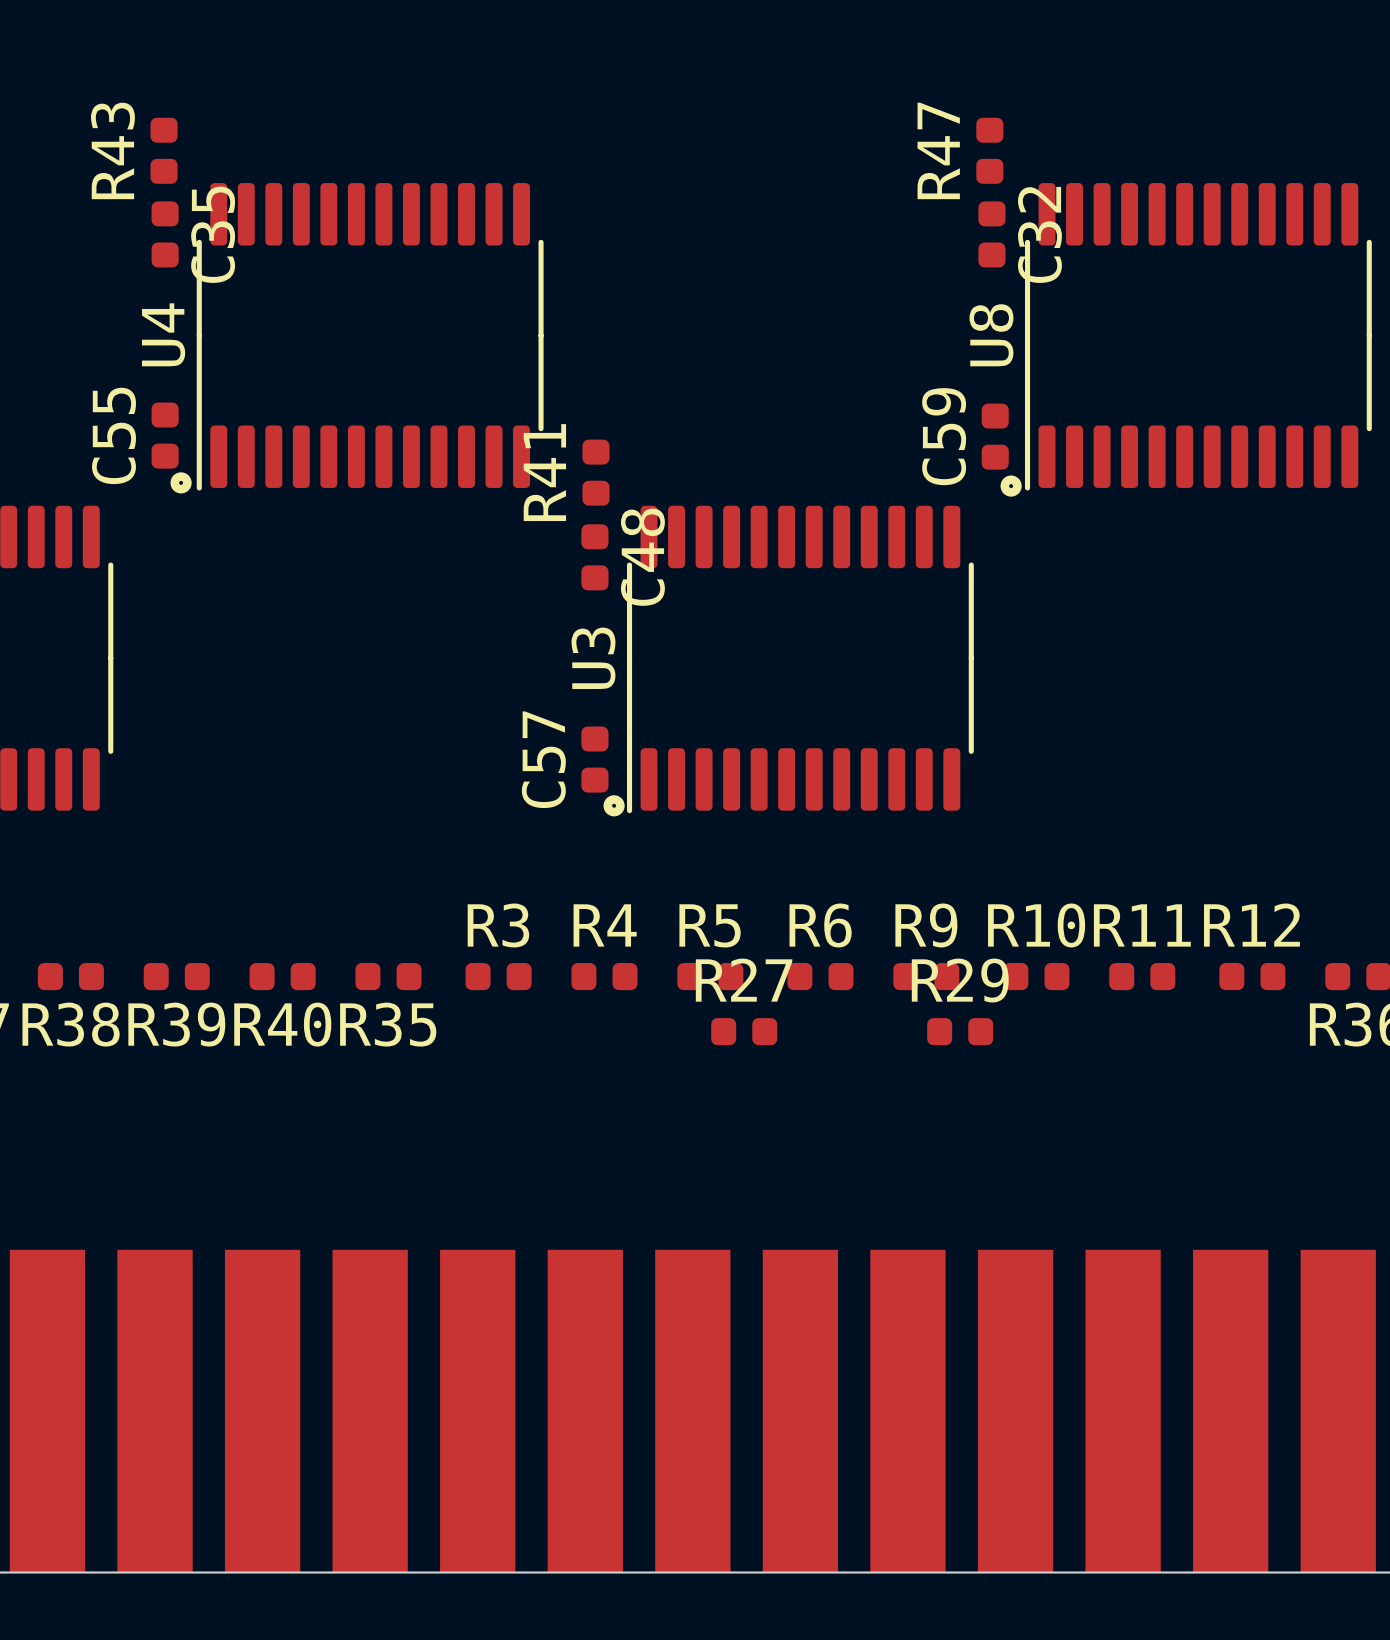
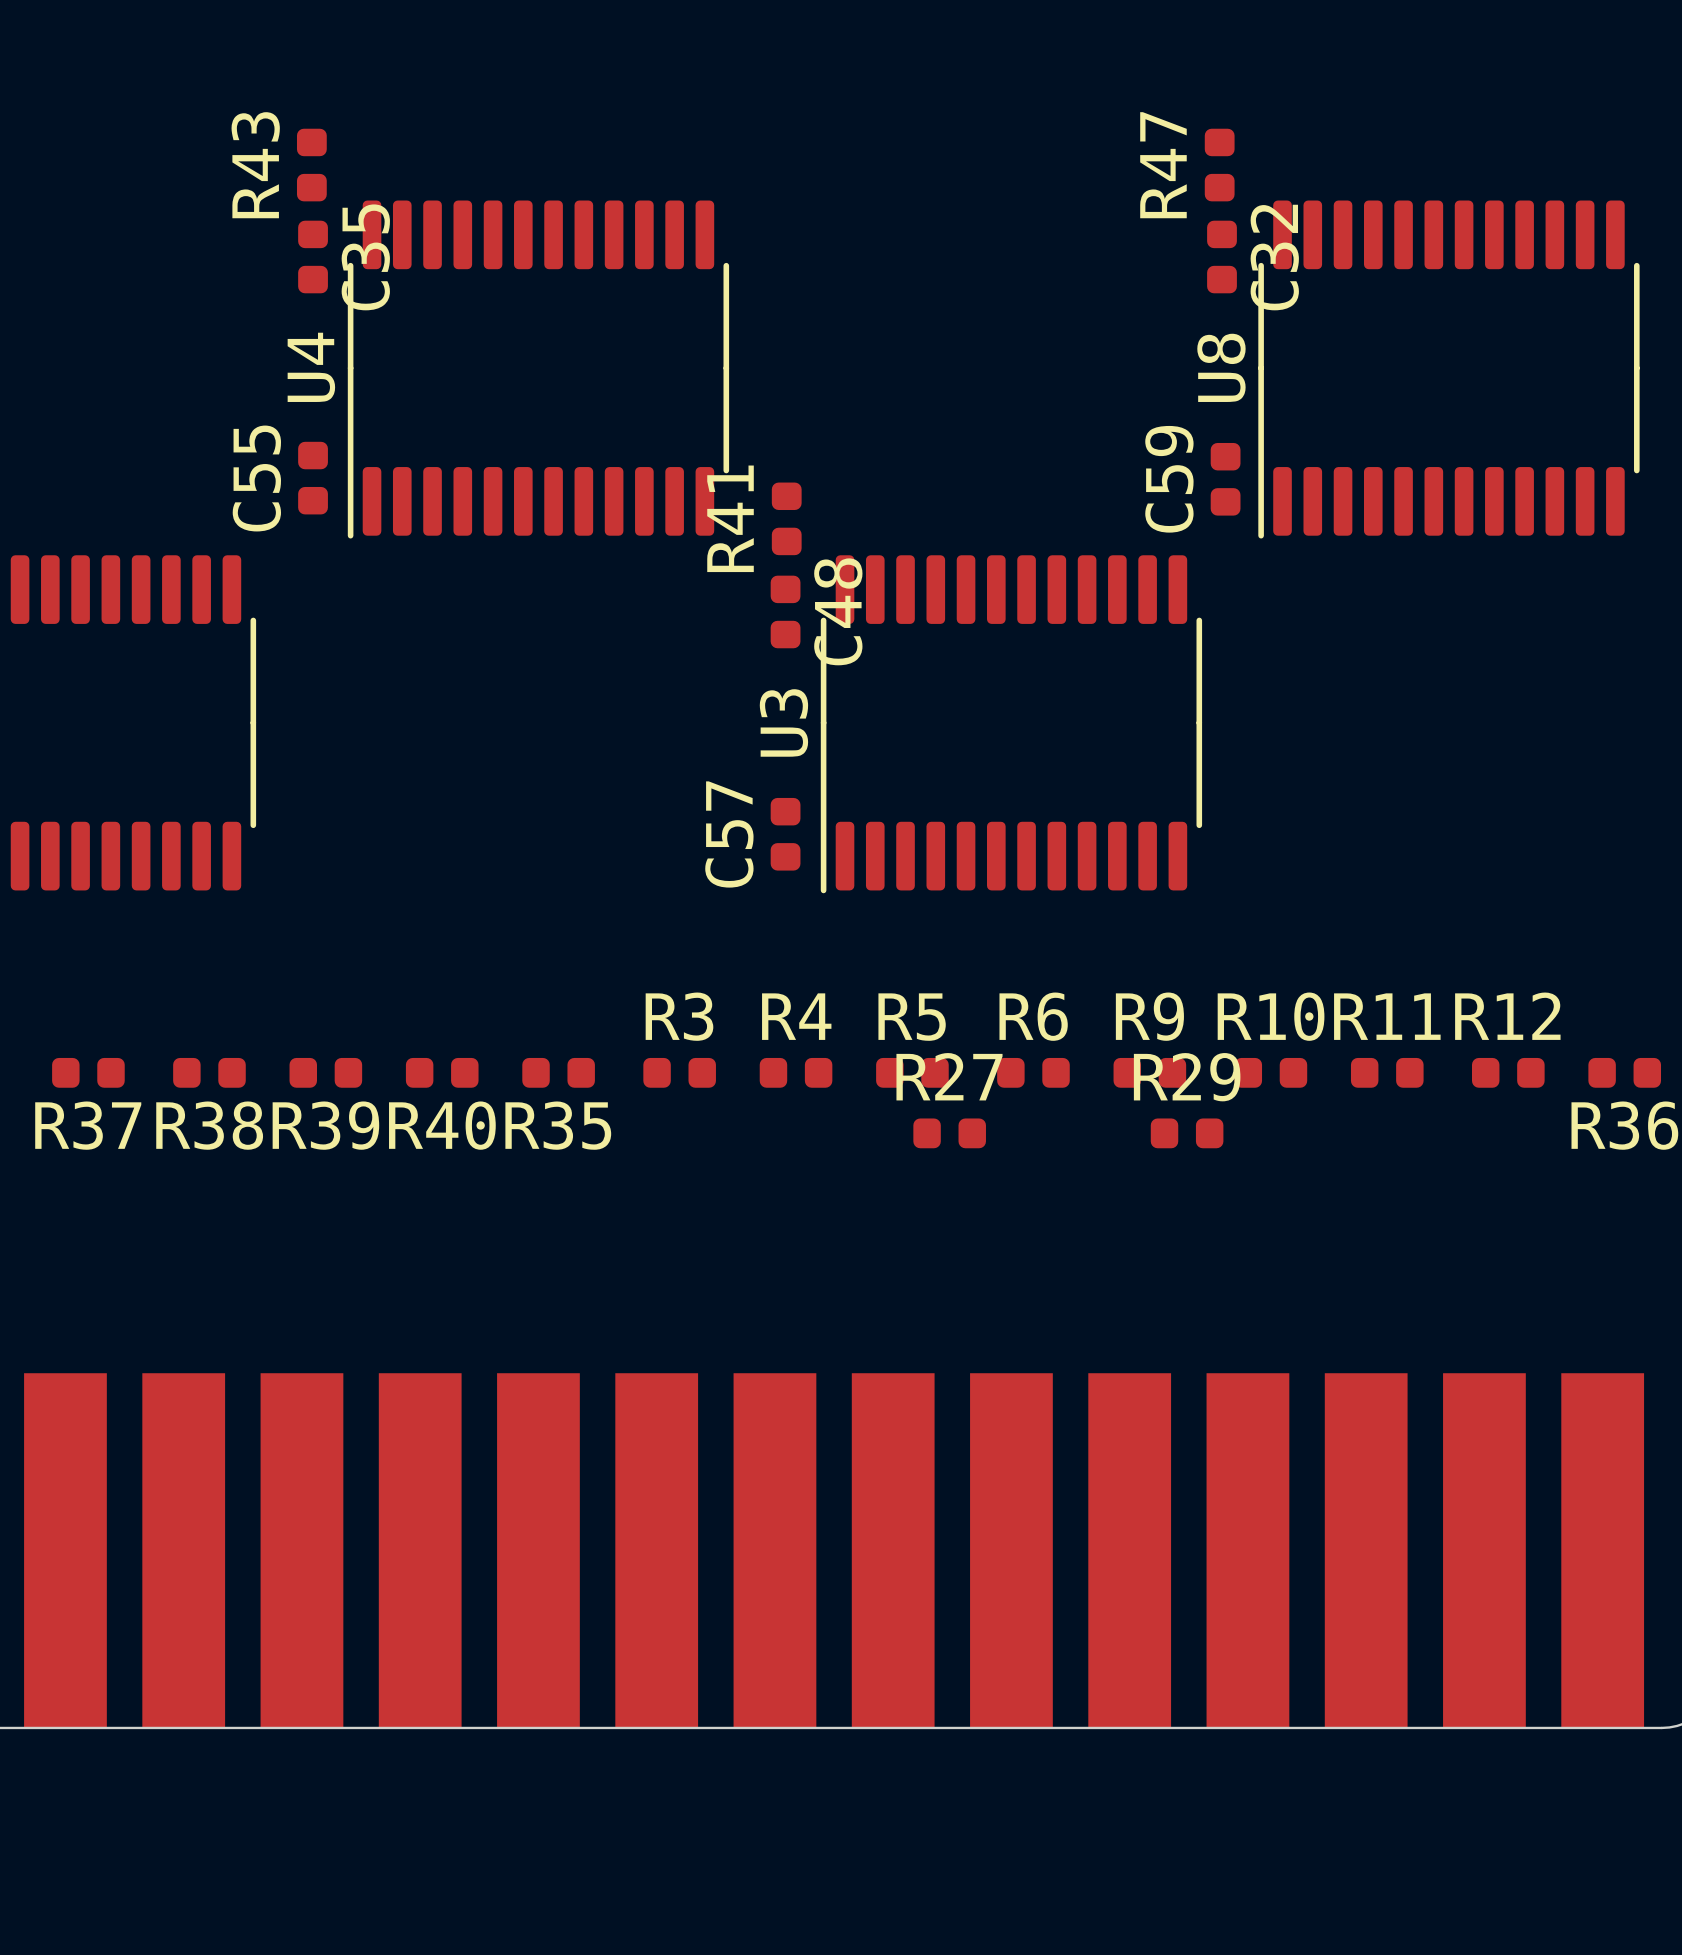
drawing: [170, 472, 192, 494] -> none
drawing: [1000, 475, 1022, 497] -> none
drawing: [603, 795, 625, 817] -> none

